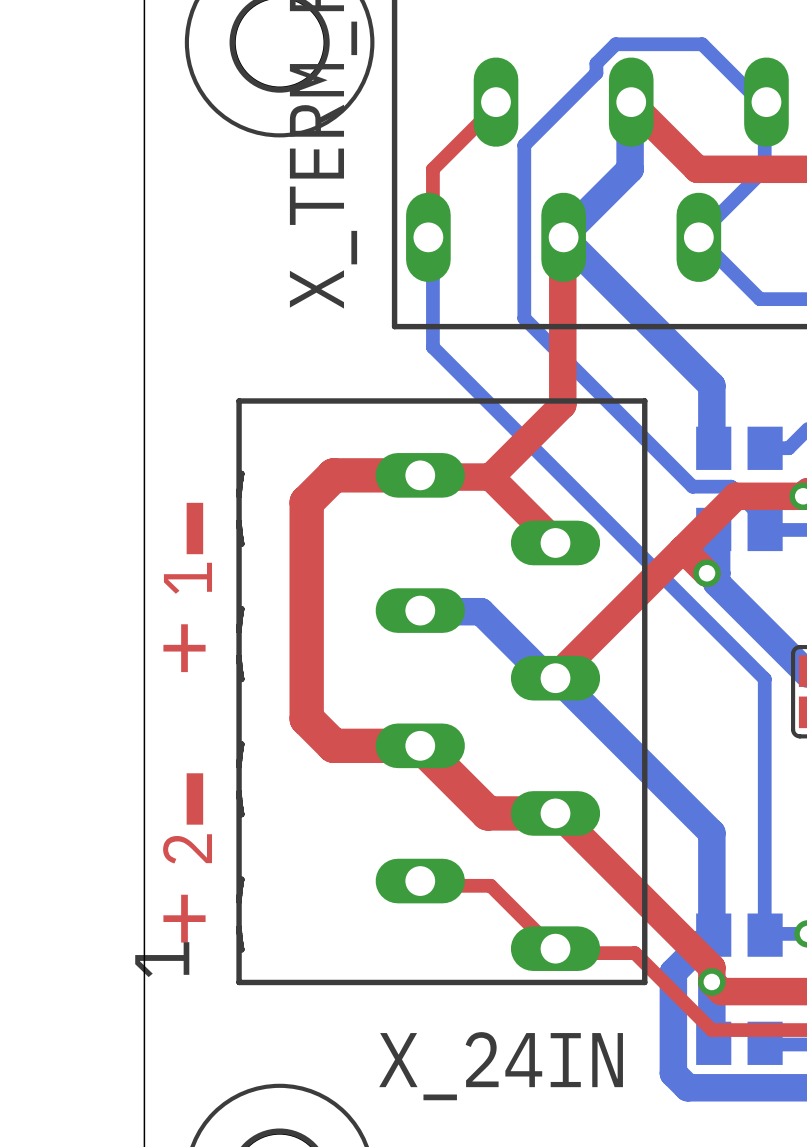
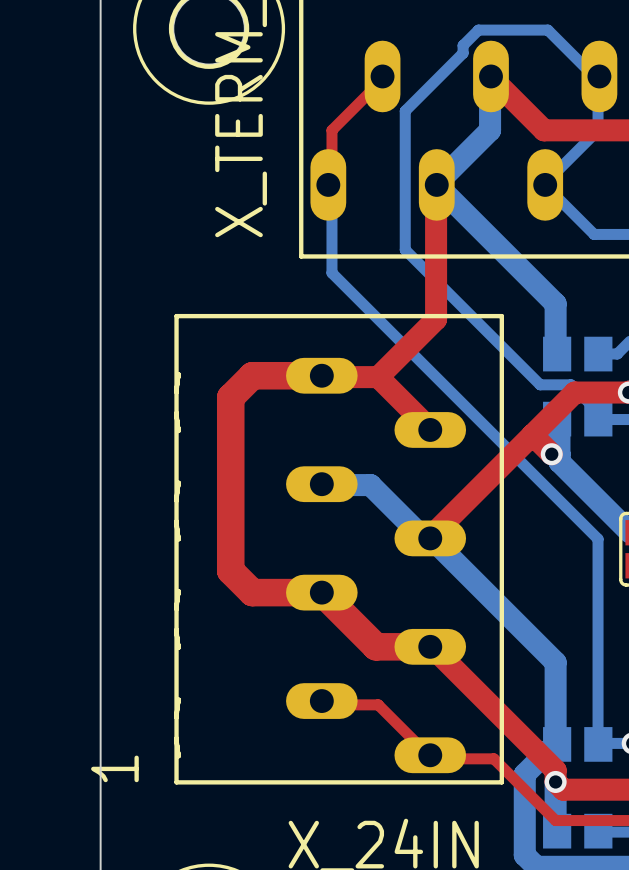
text: - (194, 528) -> none
text: 1 (187, 578) -> none
text: + (184, 648) -> none
text: - (194, 798) -> none
text: 2 (187, 848) -> none
text: + (184, 918) -> none

